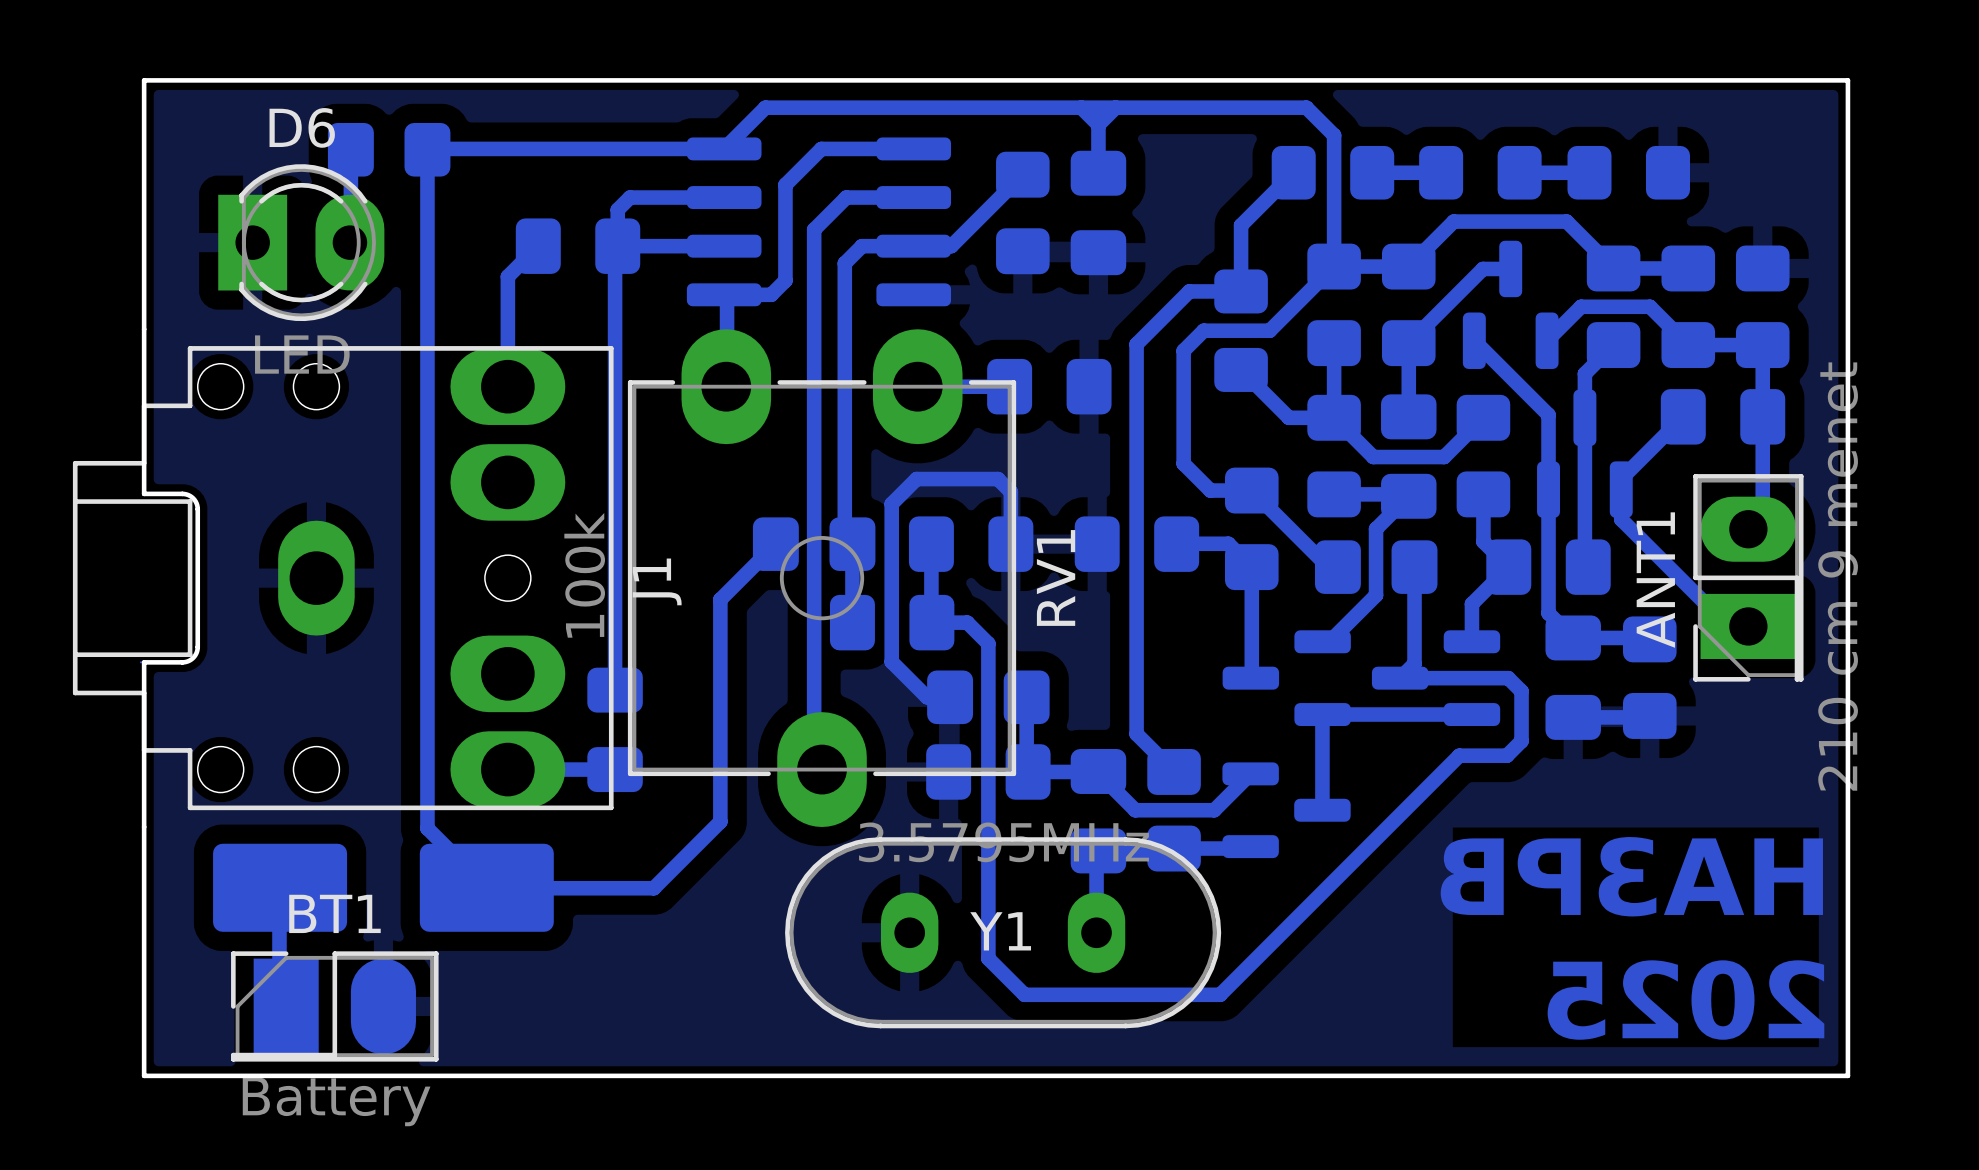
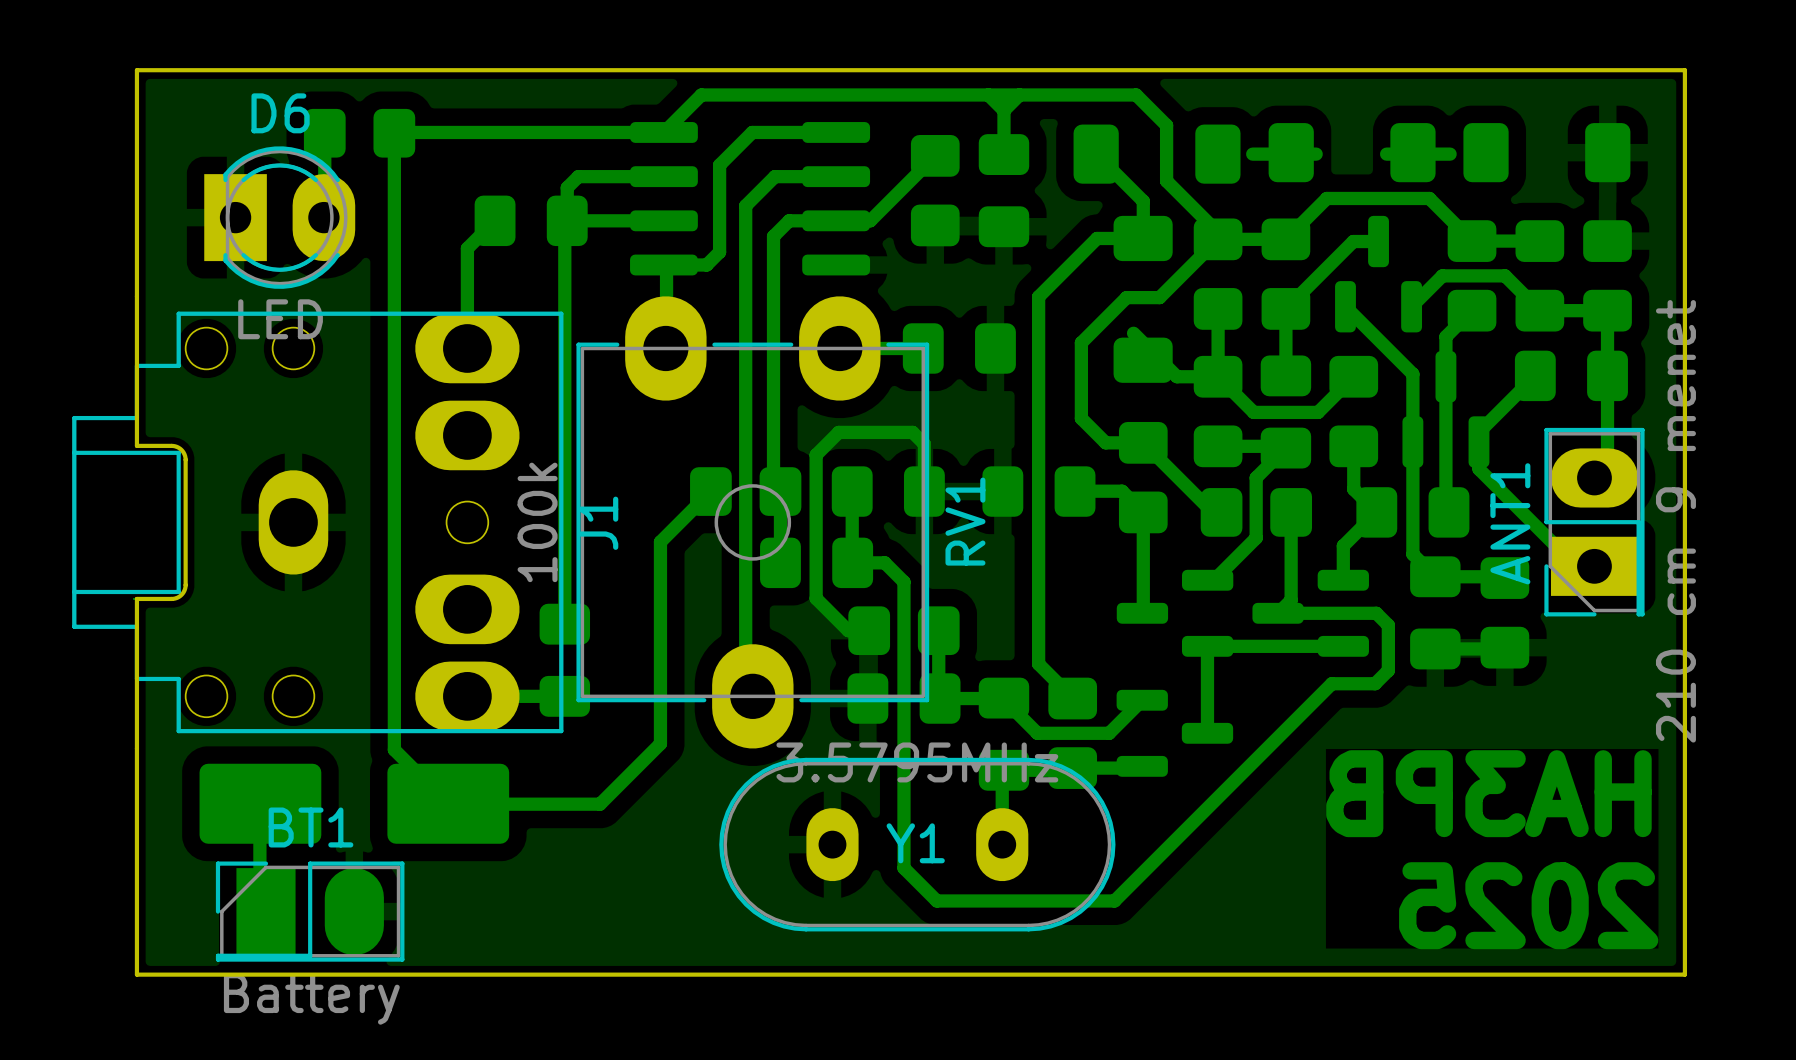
bottom track: (1243, 107) (1306, 107) (1334, 135) (1334, 259) -> (1136, 94) (1166, 125) (1166, 181) (1218, 232)
part footprint: [1419, 145, 1542, 200] -> [1268, 123, 1436, 183]
part: none -> (1546, 152)
part: none -> (1157, 154)
bottom track: (1293, 172) (1241, 225) (1241, 291) (1189, 291) (1136, 344) -> (1096, 154) (1143, 201) (1143, 238) (1097, 238) (1038, 296) (1038, 309)
part: (1332, 172) -> none
part: (1628, 172) -> none
part footprint: [1214, 269, 1268, 392] -> [1113, 215, 1173, 383]
bottom track: (1233, 330) (1203, 330) (1183, 350) (1183, 380) -> (1126, 297) (1081, 342)

